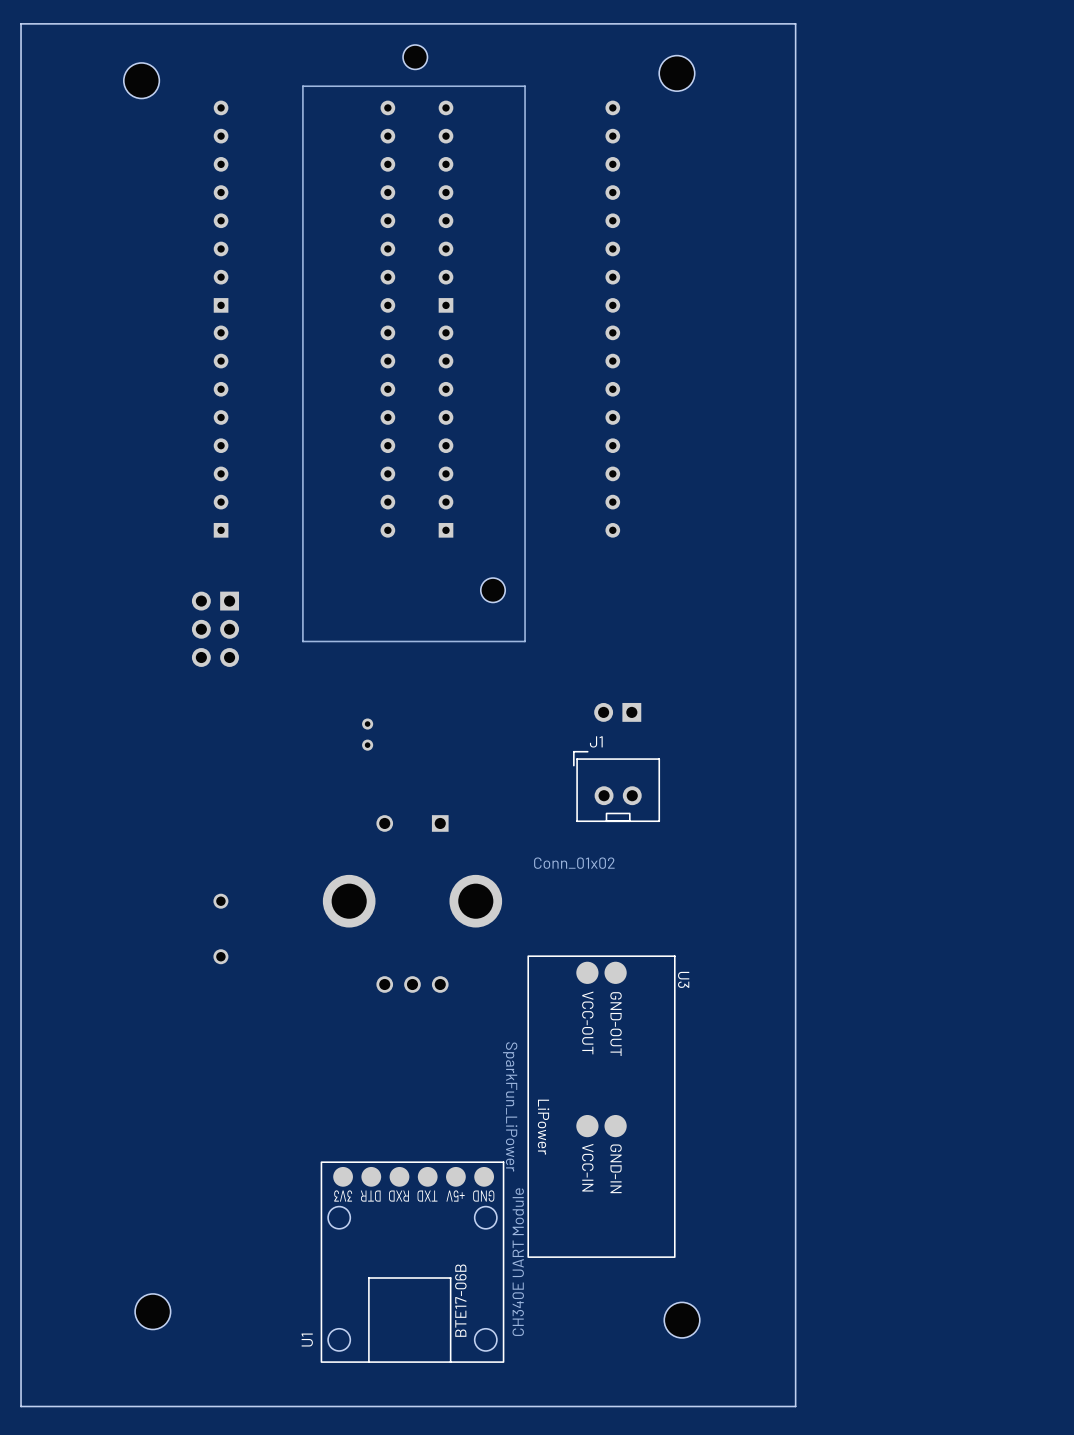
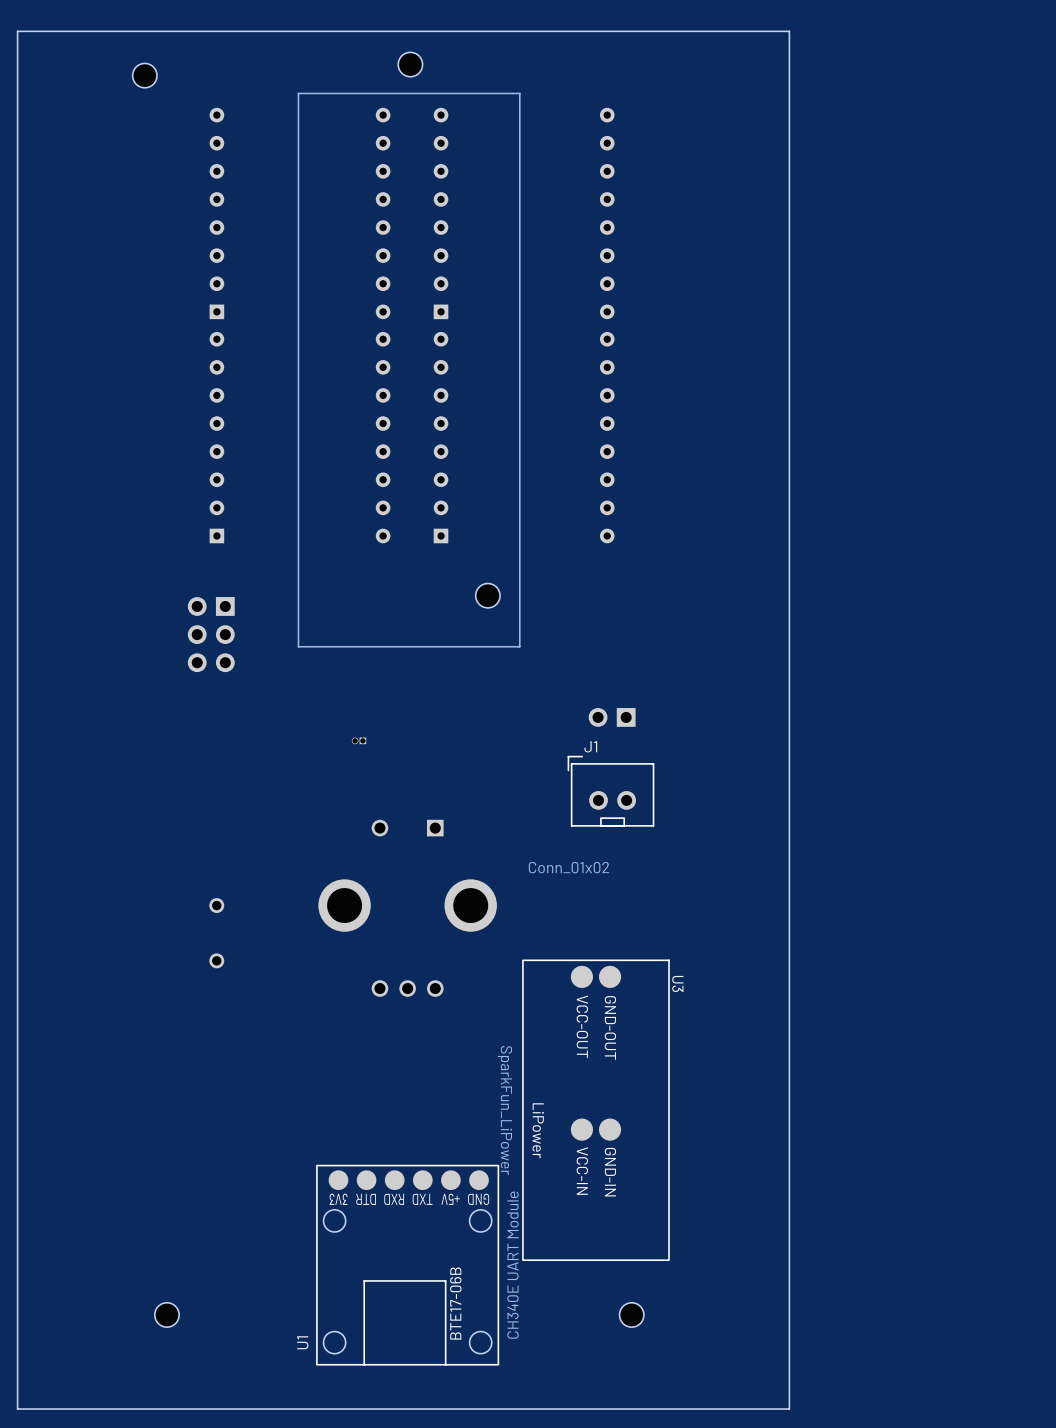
part: none -> (144, 75)
part: (676, 73) -> none
part: (141, 80) -> none
part footprint: [362, 718, 374, 751] -> [351, 737, 367, 745]
part: (152, 1311) -> none
part: none -> (166, 1314)
part: none -> (631, 1314)
part: (682, 1320) -> none

